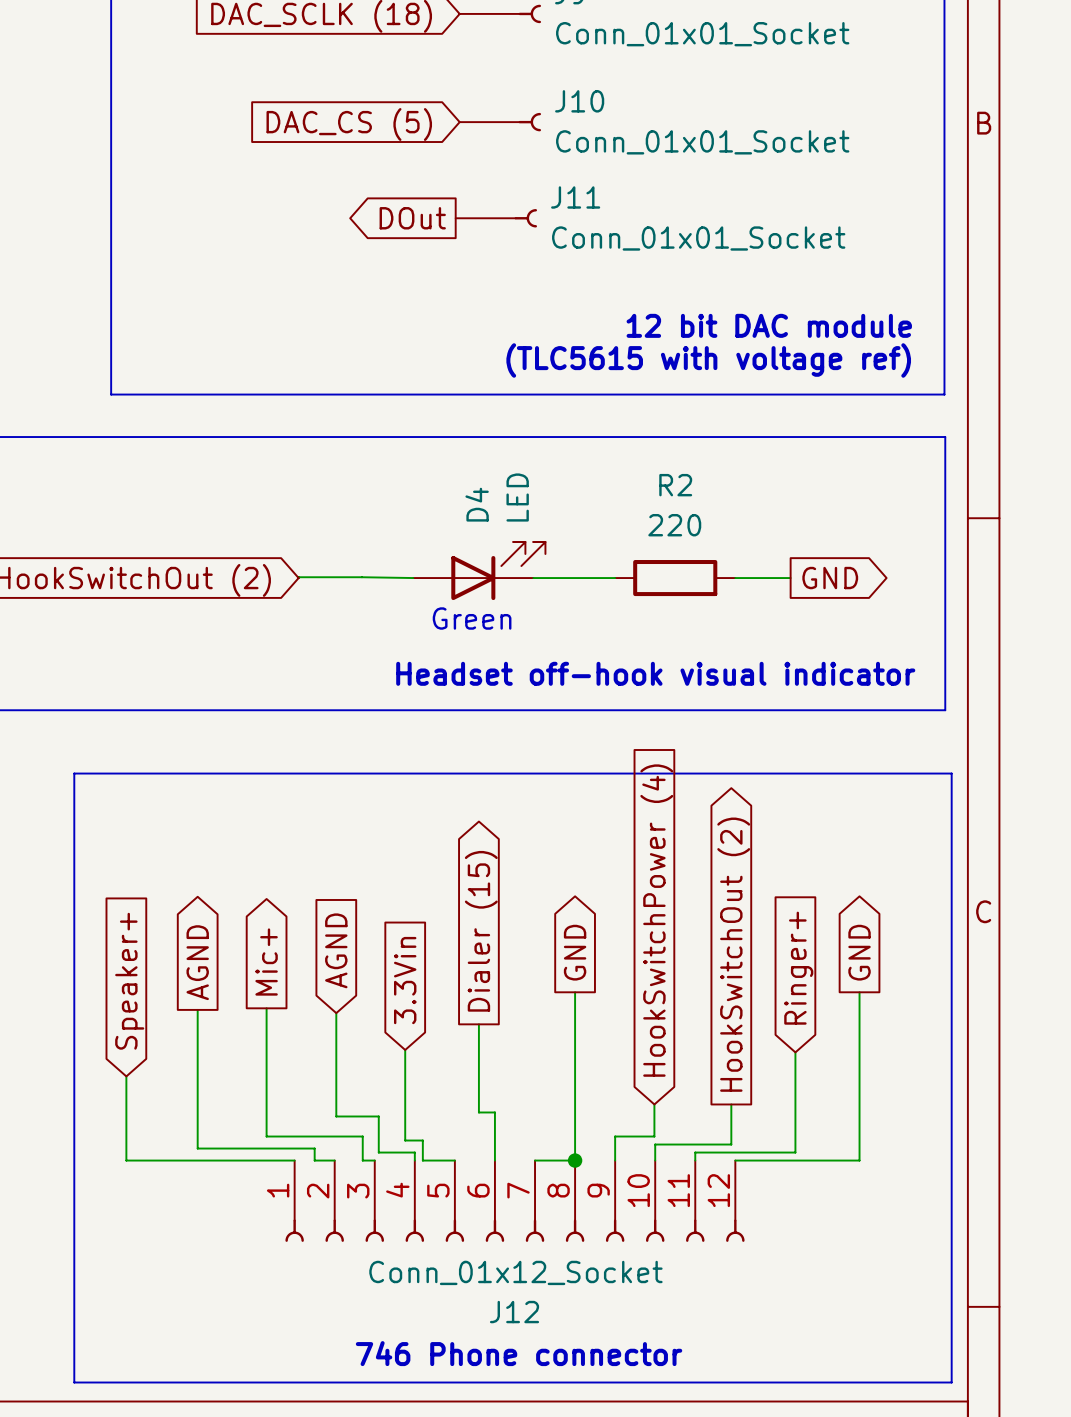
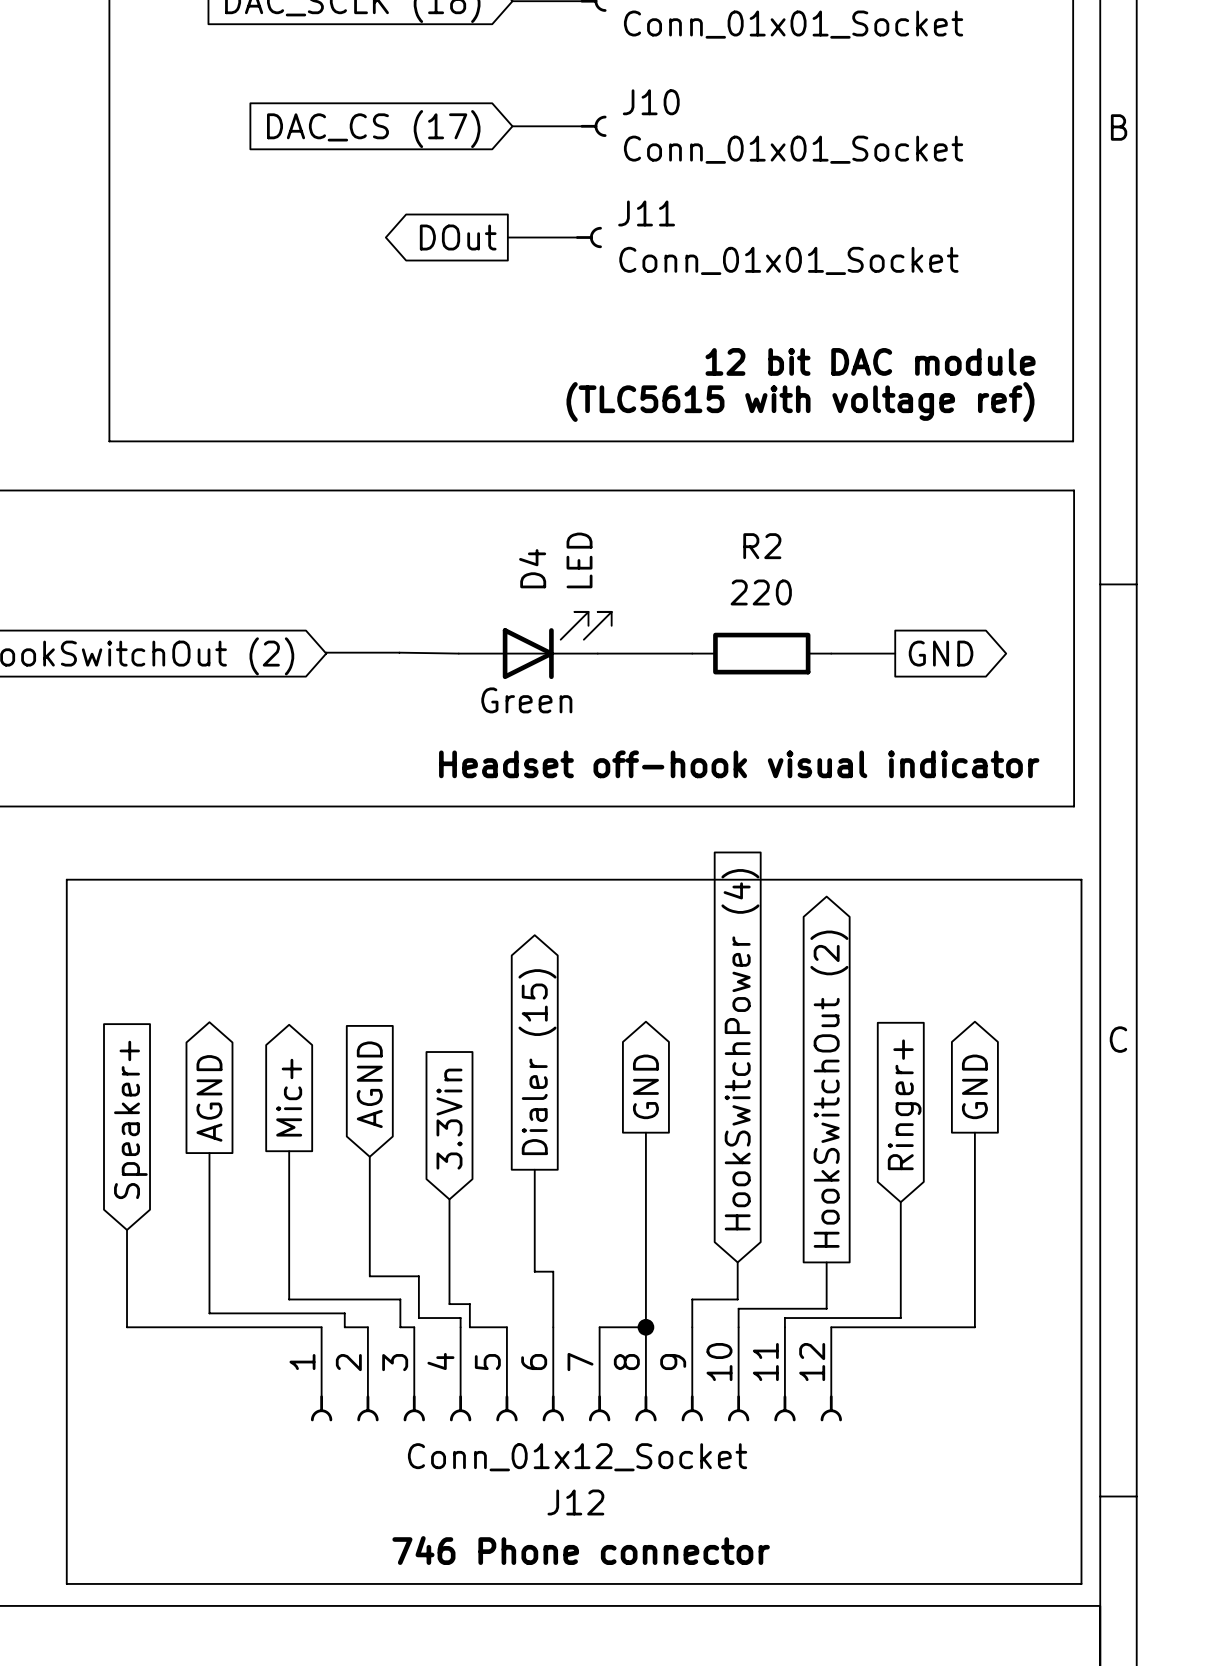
global label: DAC_CS (5) (349, 124) -> DAC_CS (17) (373, 129)

